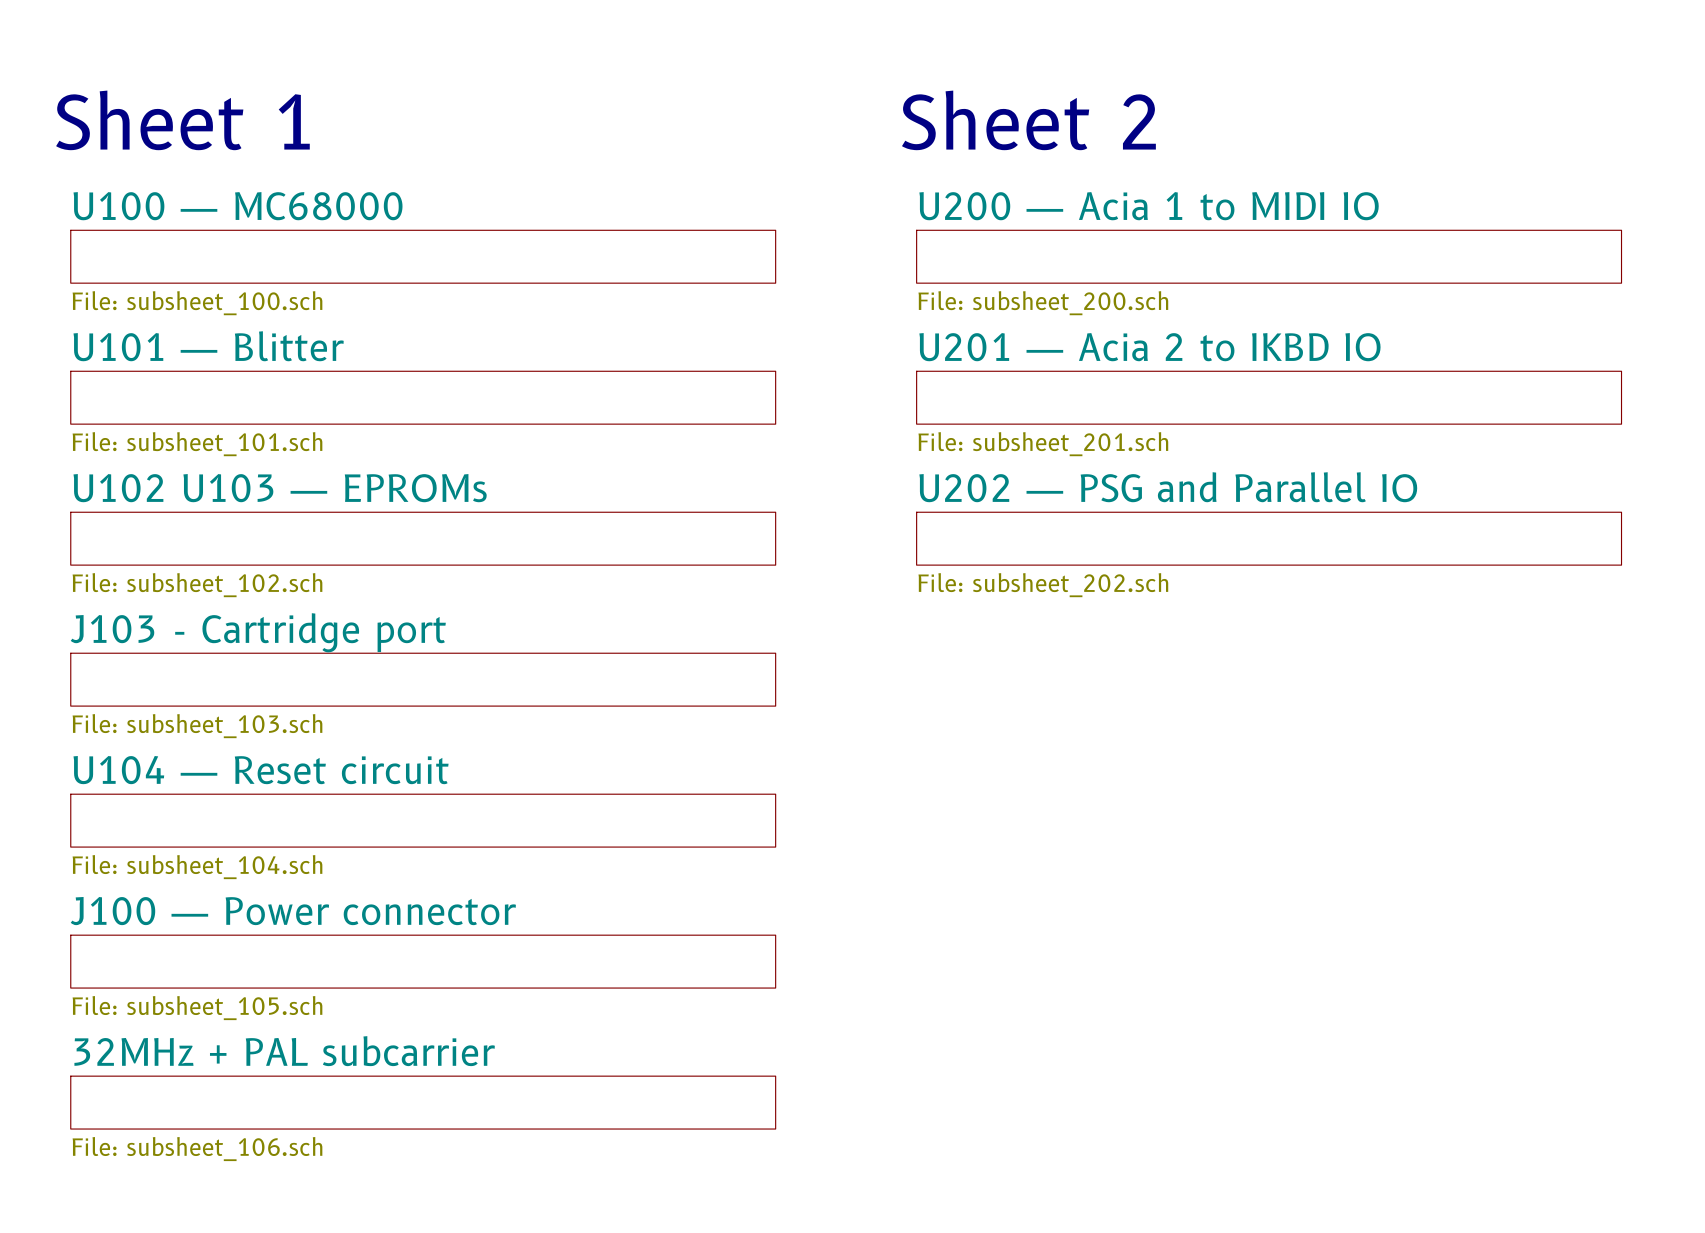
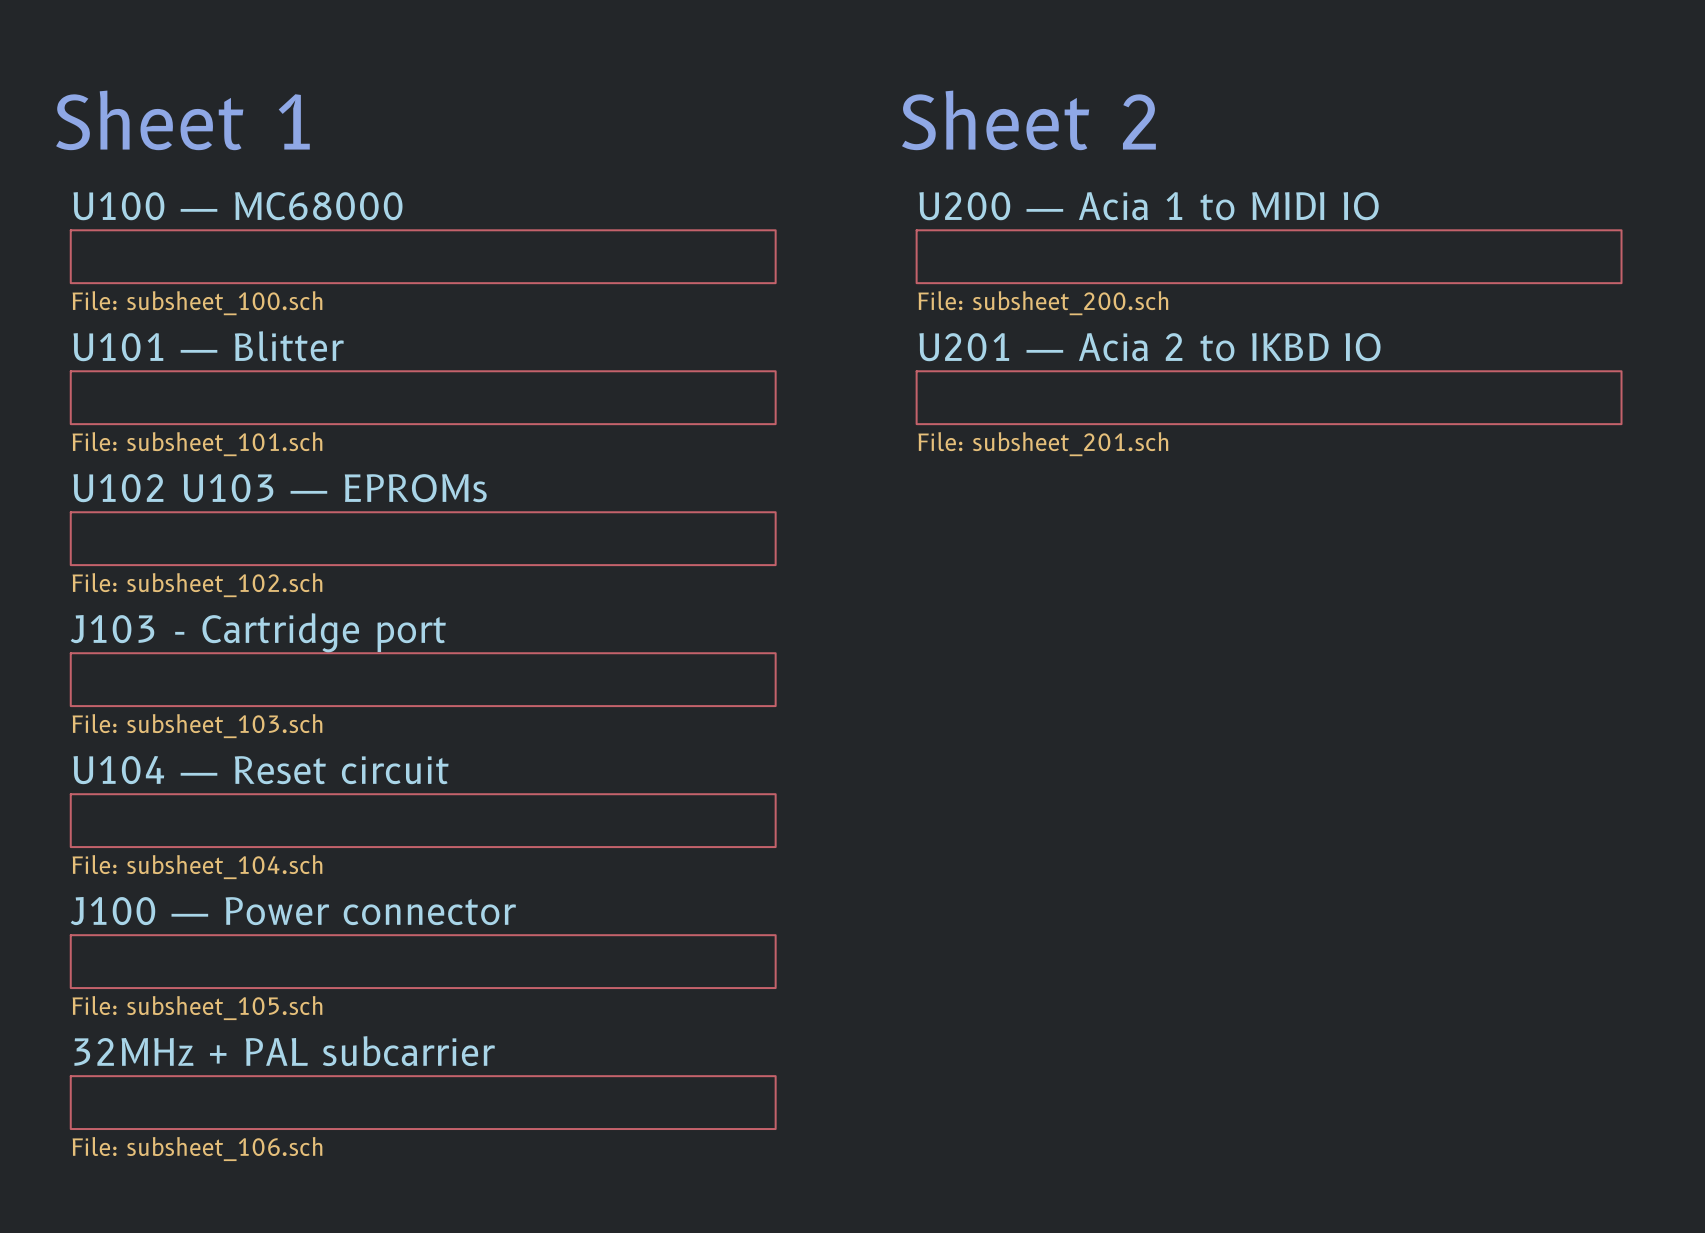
sheet U202 — PSG and Parallel IO: File: subsheet_202.sch (1269, 538) -> none

